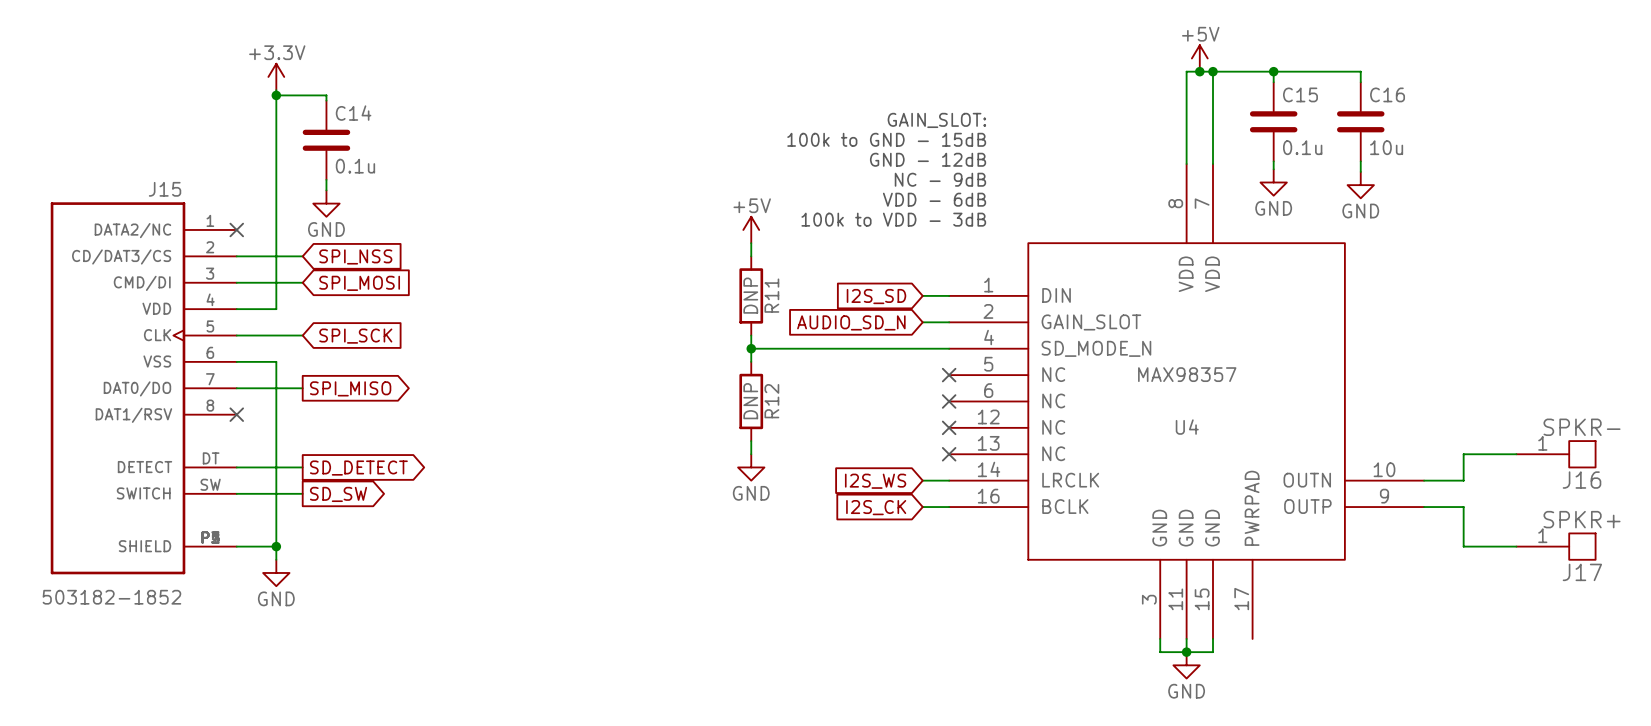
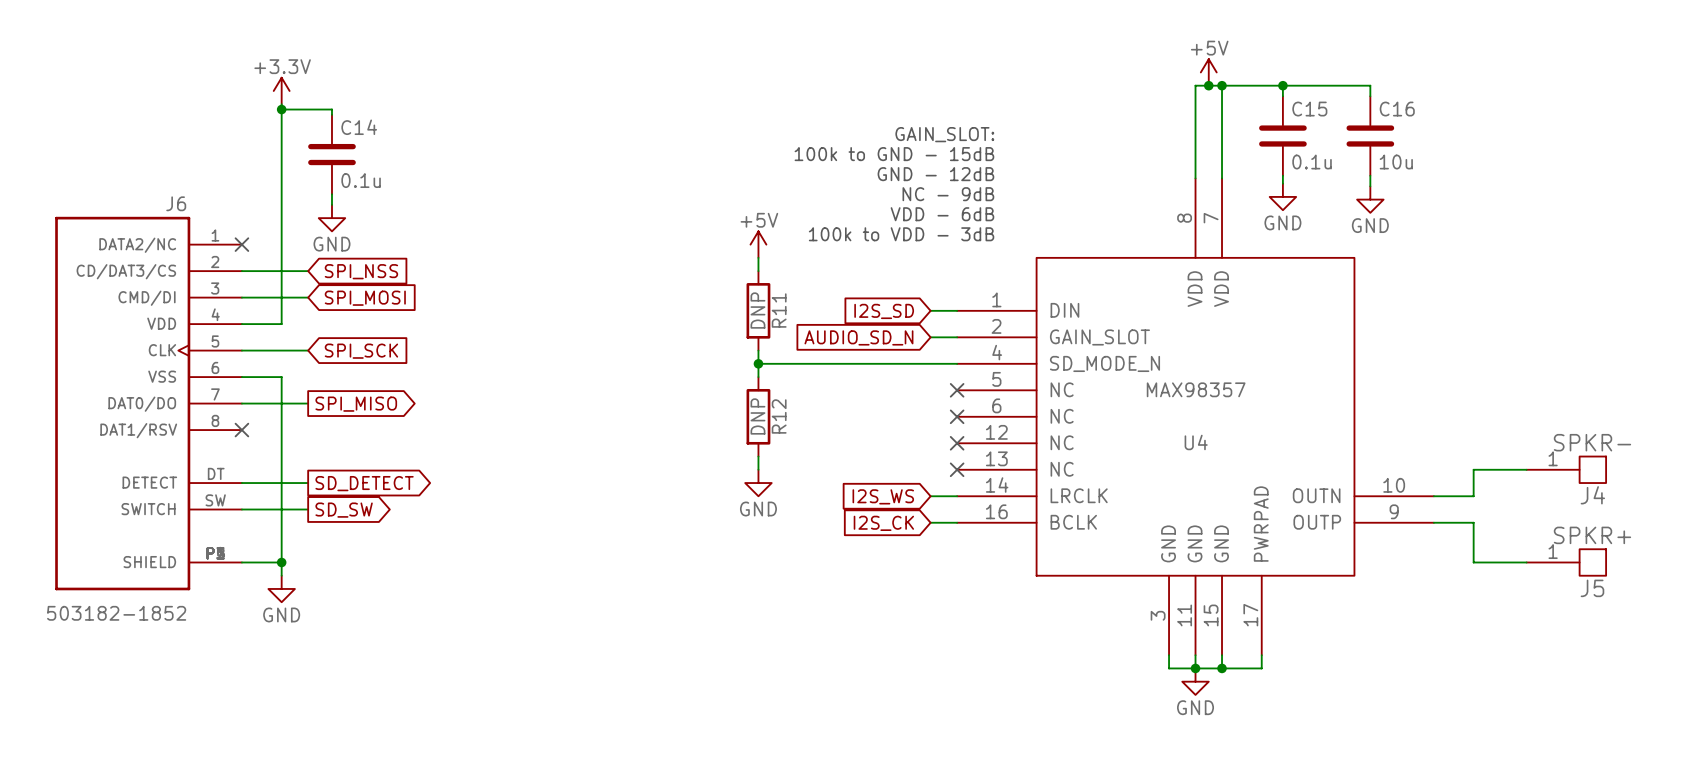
J15 name: J15 (165, 189) -> J6 (176, 203)
J16 name: J16 (1582, 480) -> J4 (1592, 495)
J17 name: J17 (1582, 572) -> J5 (1592, 588)
wire: none -> (1261, 655) (1261, 668) (1222, 668)
junction: none -> (1222, 668)

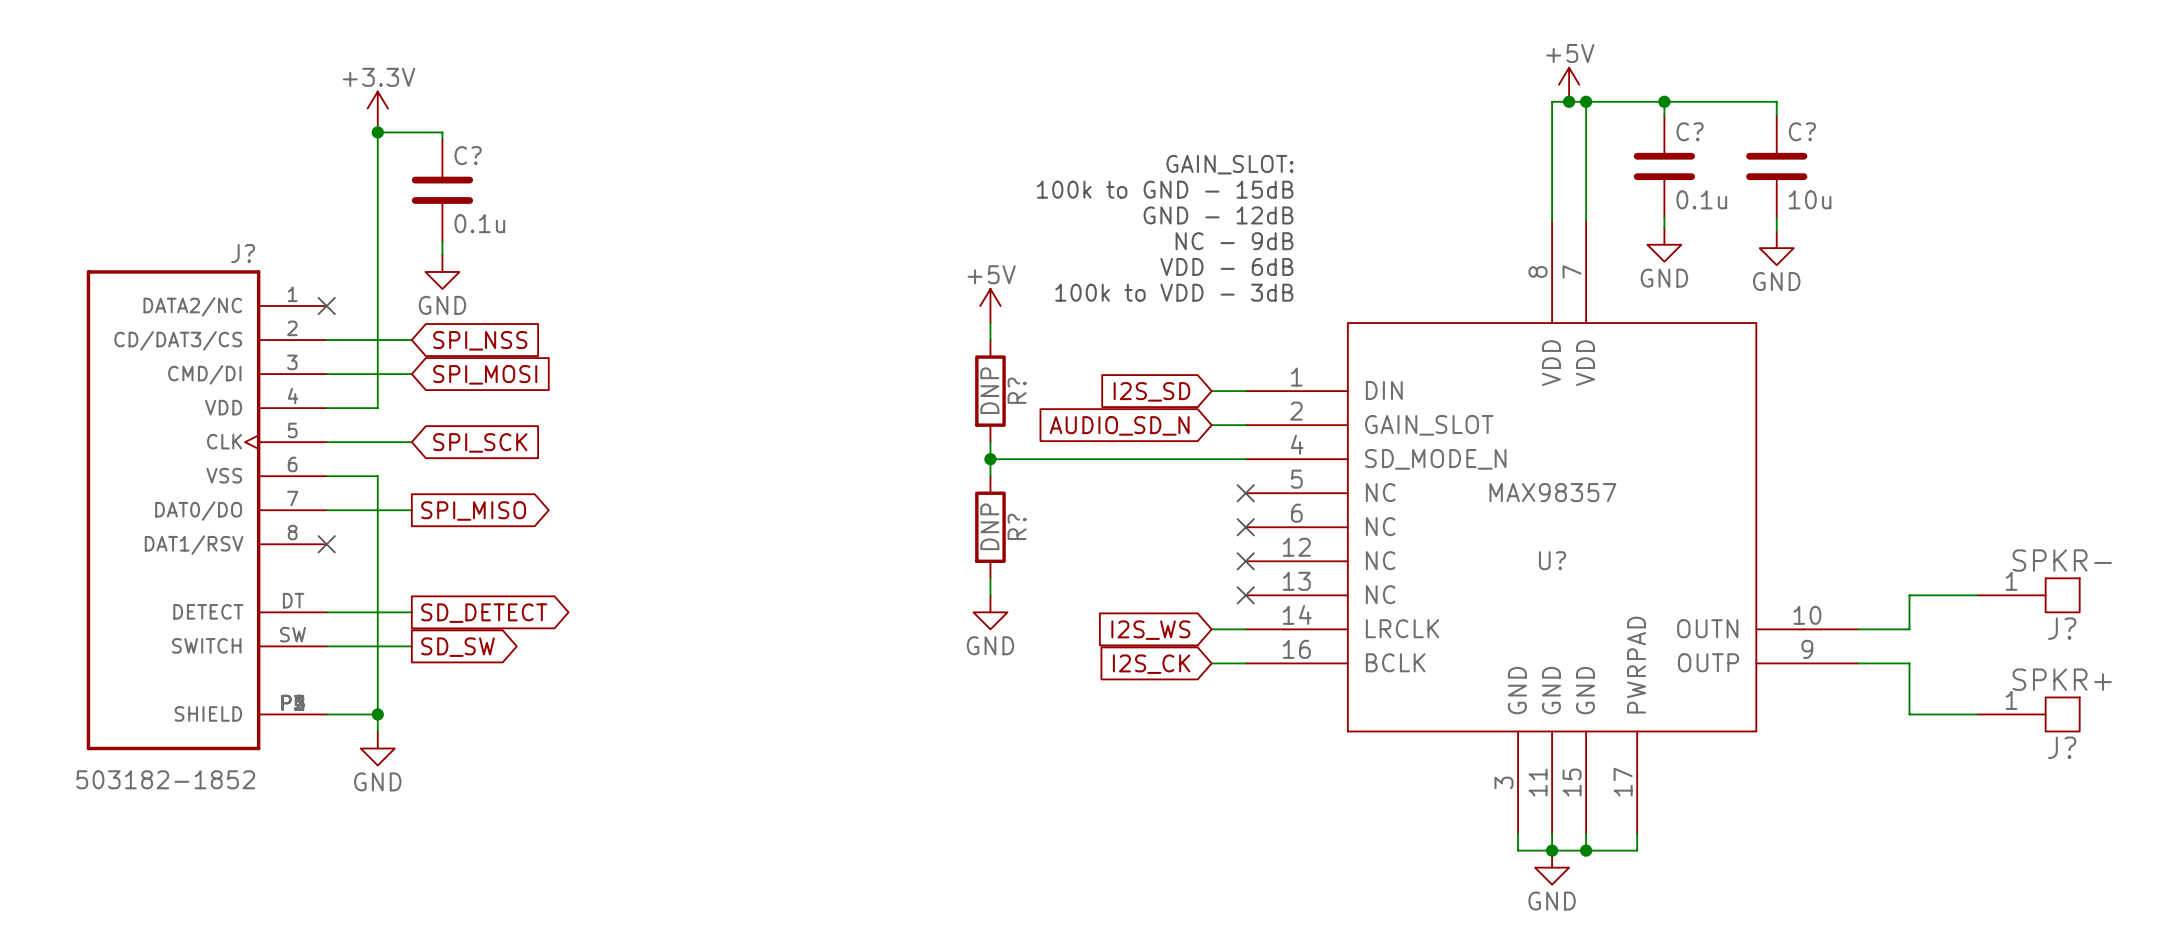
C15 name: C15 (1309, 109) -> C? (1690, 131)
C16 name: C16 (1397, 109) -> C? (1802, 131)
C14 name: C14 (359, 127) -> C? (468, 155)
J6 name: J6 (176, 203) -> J? (243, 253)
R11 name: R11 (779, 310) -> R? (1017, 390)
R12 name: R12 (779, 416) -> R? (1017, 526)
U4 name: U4 (1196, 442) -> U? (1552, 560)
J4 name: J4 (1592, 495) -> J? (2062, 628)
J5 name: J5 (1592, 588) -> J? (2062, 747)

